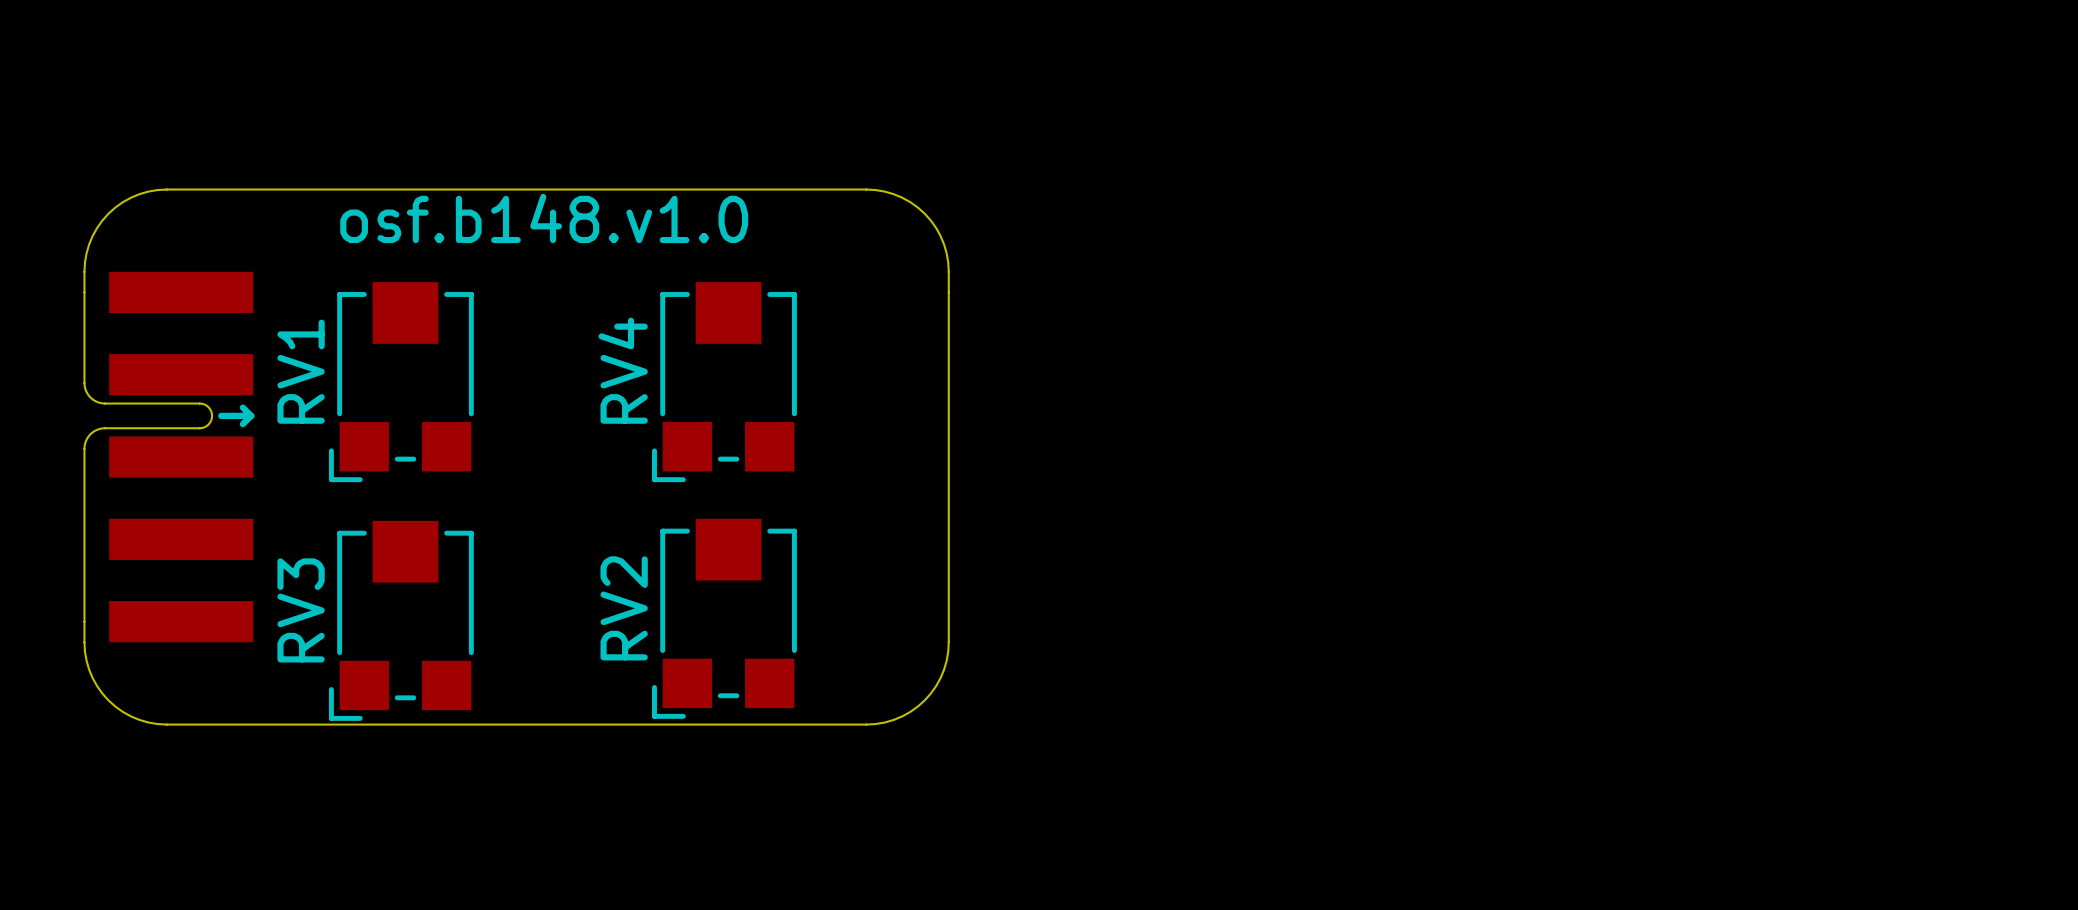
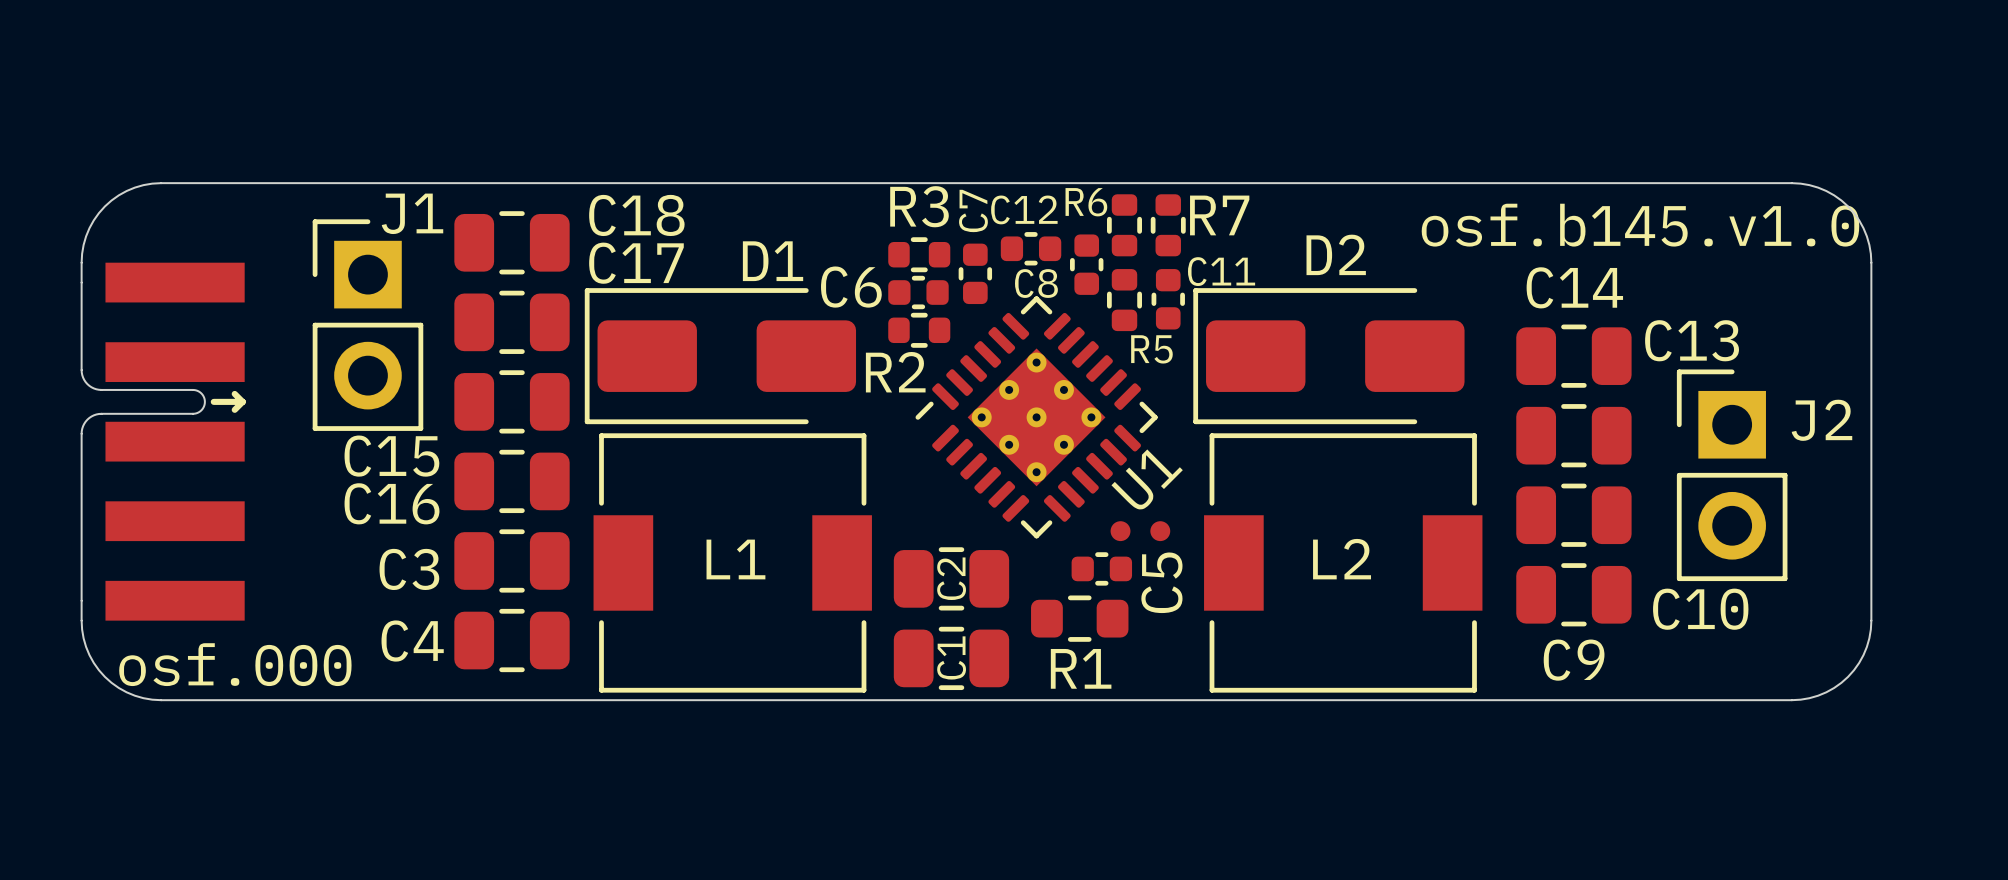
board edge: (866, 189) (893, 194) (910, 202) (924, 213) (940, 236) (946, 253) (948, 271) (948, 642) (946, 660) (936, 686) (917, 706) (893, 719) (866, 724) -> (837, 183) (1800, 183) (1826, 191) (1848, 206) (1863, 228) (1869, 244) (1871, 262) (1870, 629) (1866, 646) (1859, 662) (1848, 676) (1826, 692) (1809, 698) (1791, 700) (837, 700)
text: osf.b148.v1.0 (544, 218) -> none
text: none -> osf.b145.v1.0 (1640, 225)
R6: none -> (1124, 225)
R7: none -> (1168, 225)
C18: none -> (512, 242)
C8: none -> (1031, 248)
R3: none -> (919, 254)
C12: none -> (1086, 264)
C7: none -> (975, 273)
C6: none -> (918, 292)
C11: none -> (1168, 299)
R5: none -> (1124, 300)
C17: none -> (512, 322)
J1: none -> (367, 325)
R2: none -> (919, 330)
D1: none -> (720, 356)
D2: none -> (1328, 356)
C14: none -> (1573, 356)
RV1: (401, 382) -> none
RV4: (724, 382) -> none
C15: none -> (512, 401)
U1: none -> (1036, 417)
C13: none -> (1573, 435)
J2: none -> (1732, 475)
C16: none -> (512, 481)
C10: none -> (1573, 515)
part: none -> (1140, 531)
C3: none -> (512, 560)
L1: none -> (732, 562)
L2: none -> (1343, 562)
C5: none -> (1101, 568)
C2: none -> (951, 578)
C9: none -> (1573, 594)
RV2: (724, 618) -> none
RV3: (401, 620) -> none
R1: none -> (1079, 618)
C4: none -> (512, 640)
C1: none -> (951, 658)
text: none -> osf.000 (235, 664)

